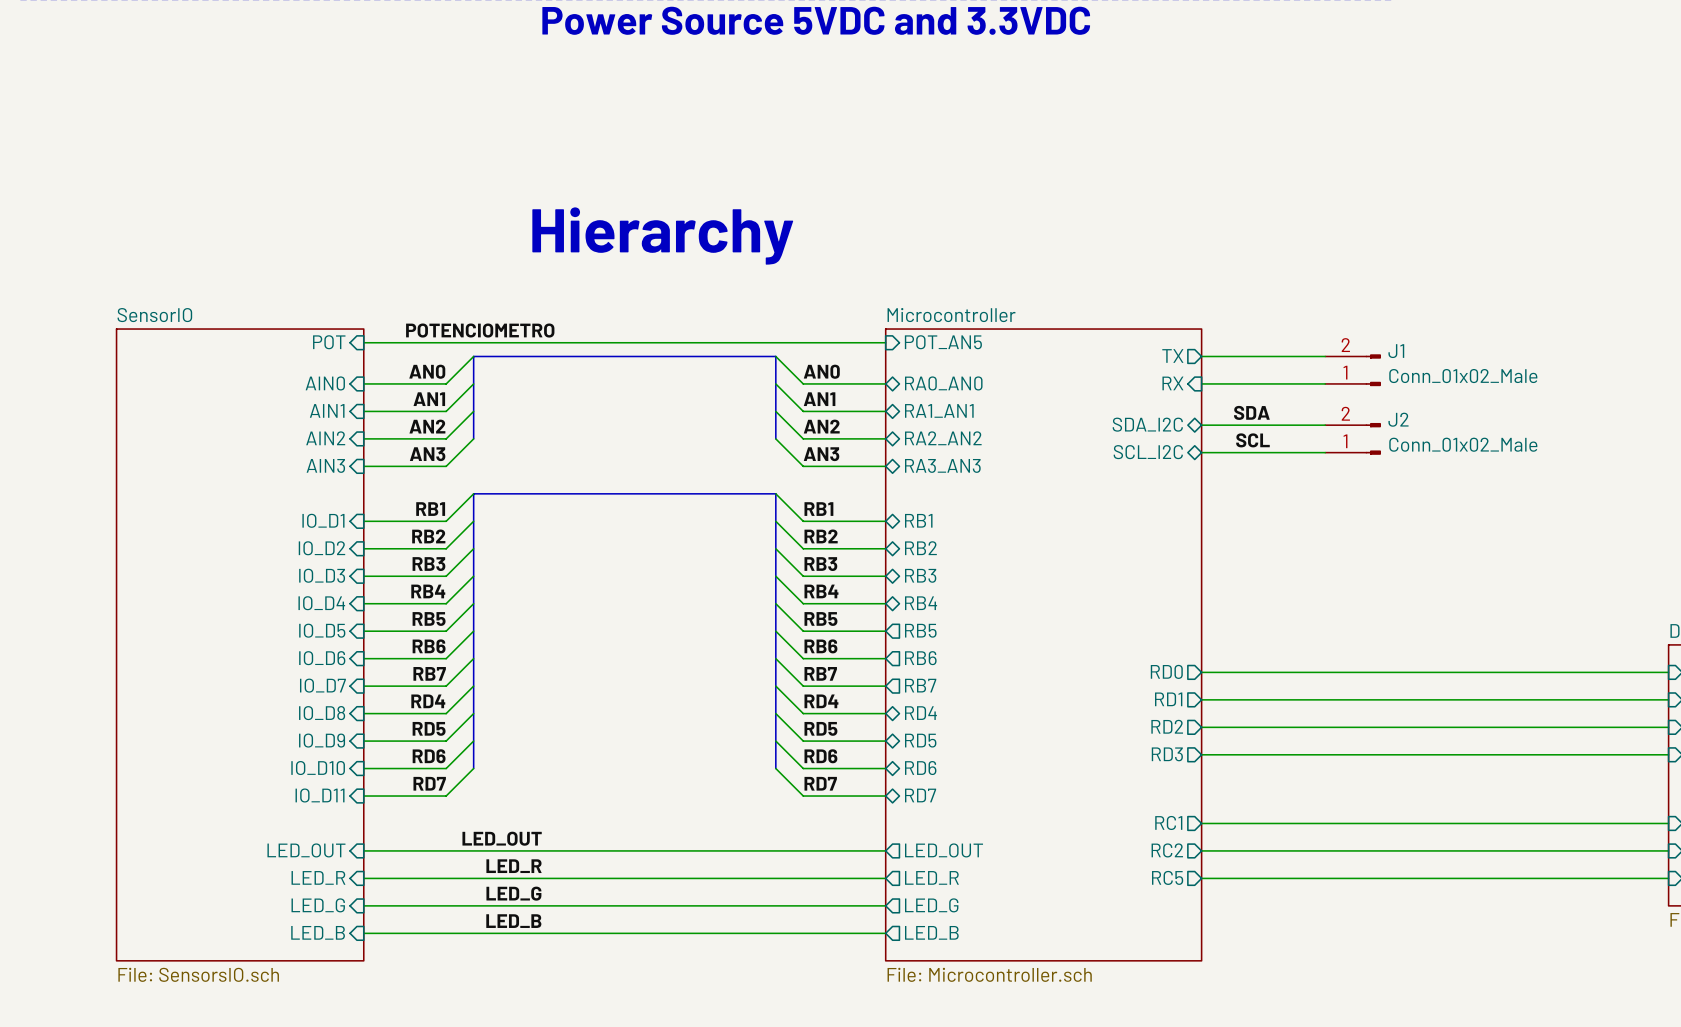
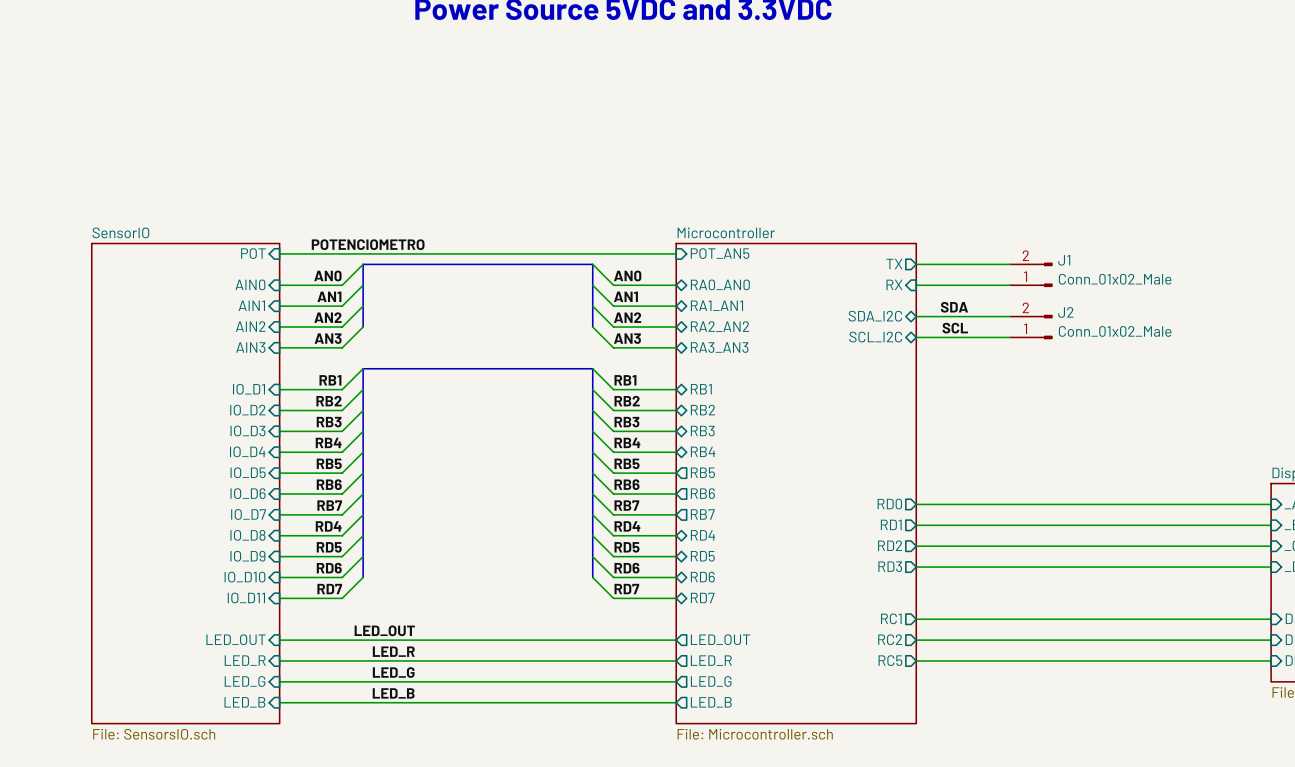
text: Hierarchy (662, 236) -> none

